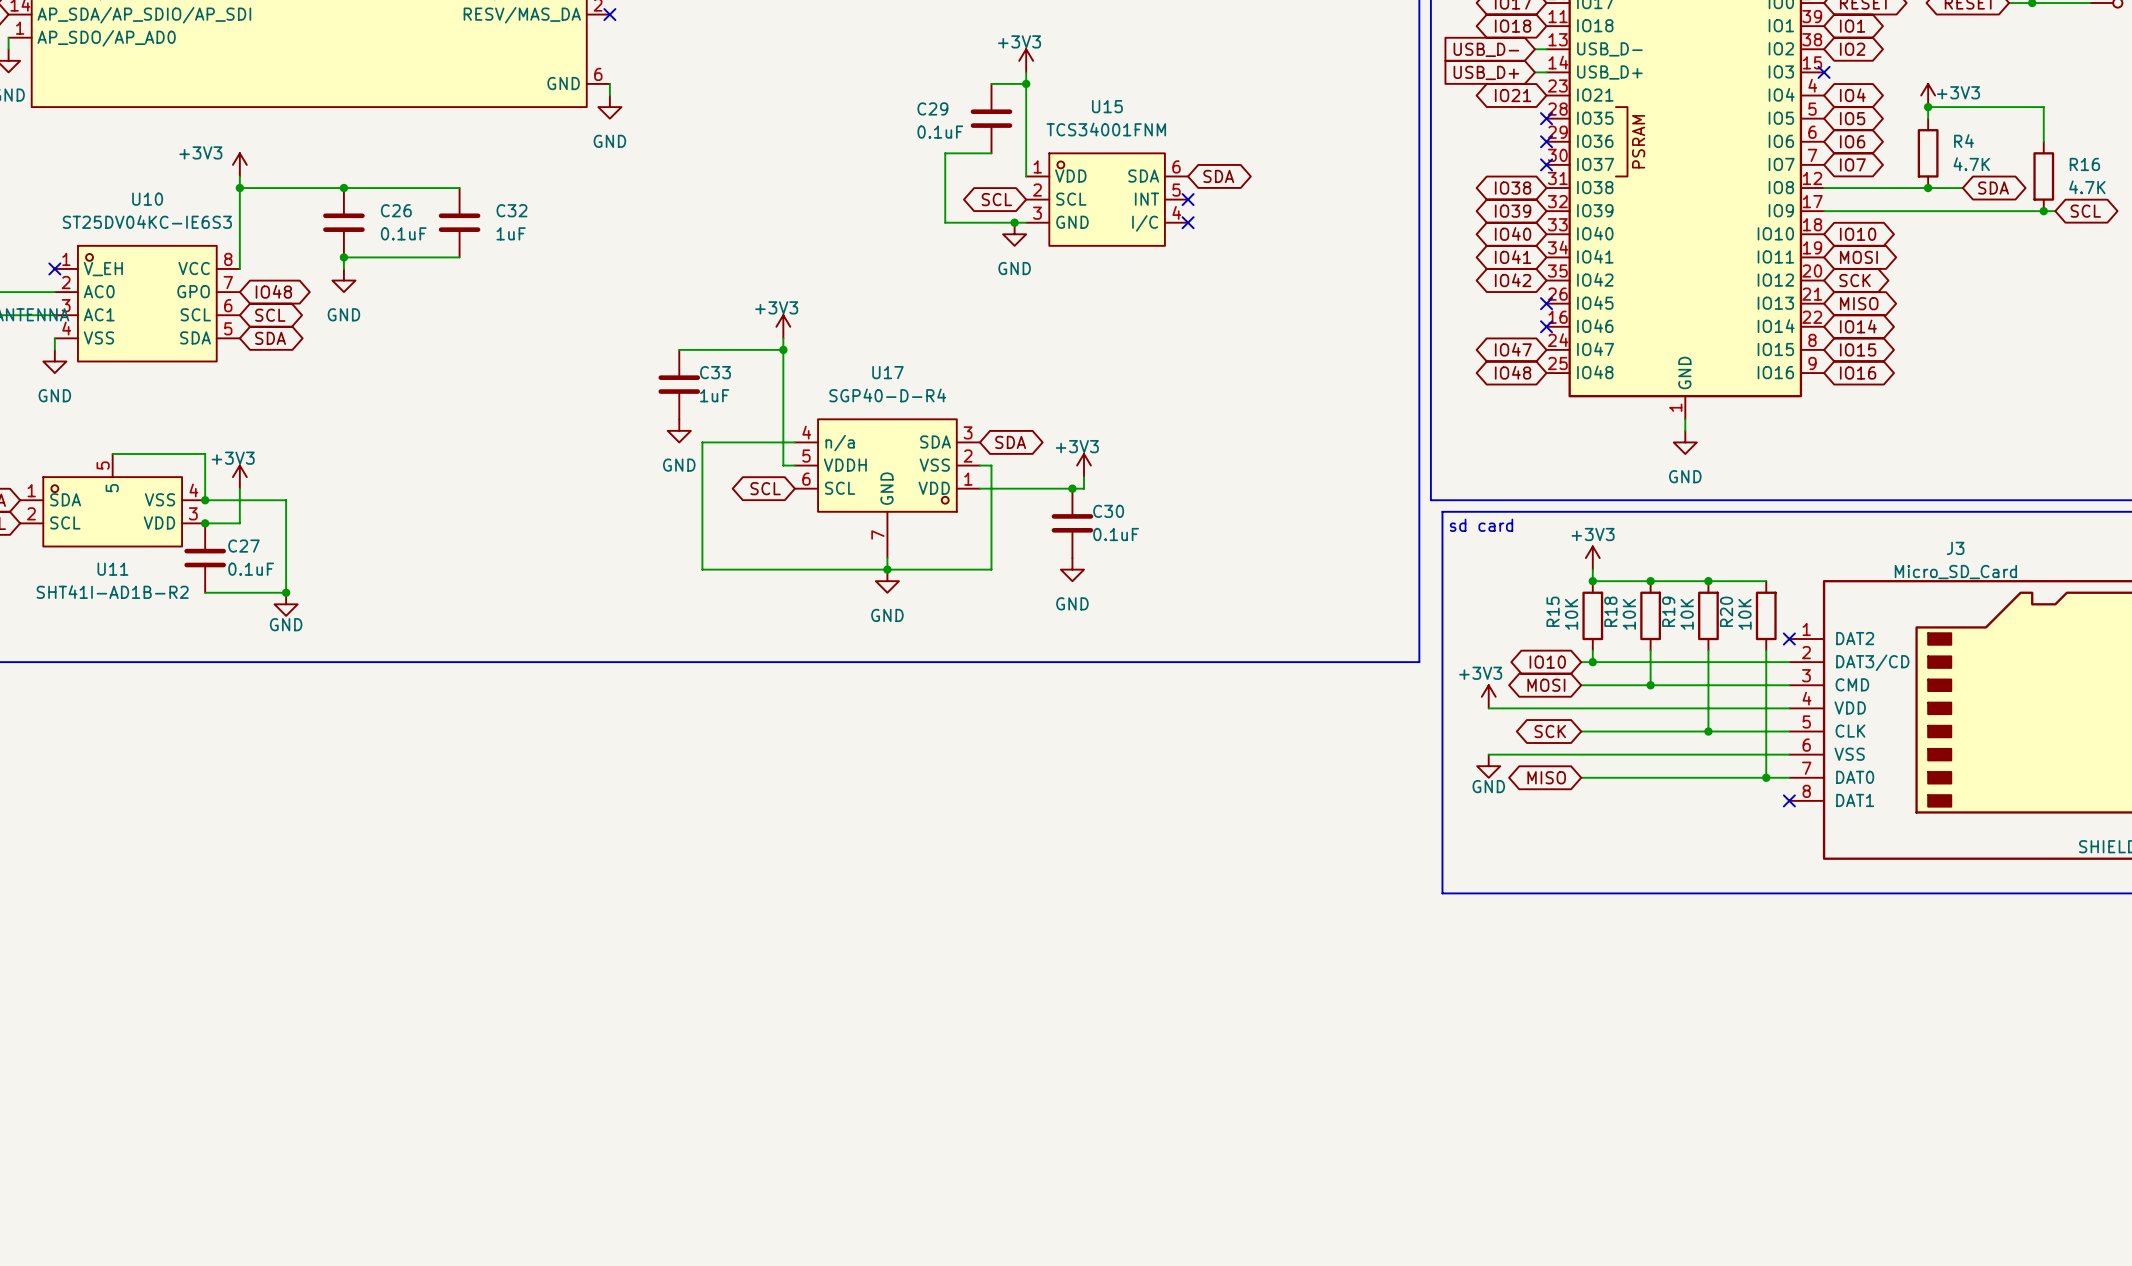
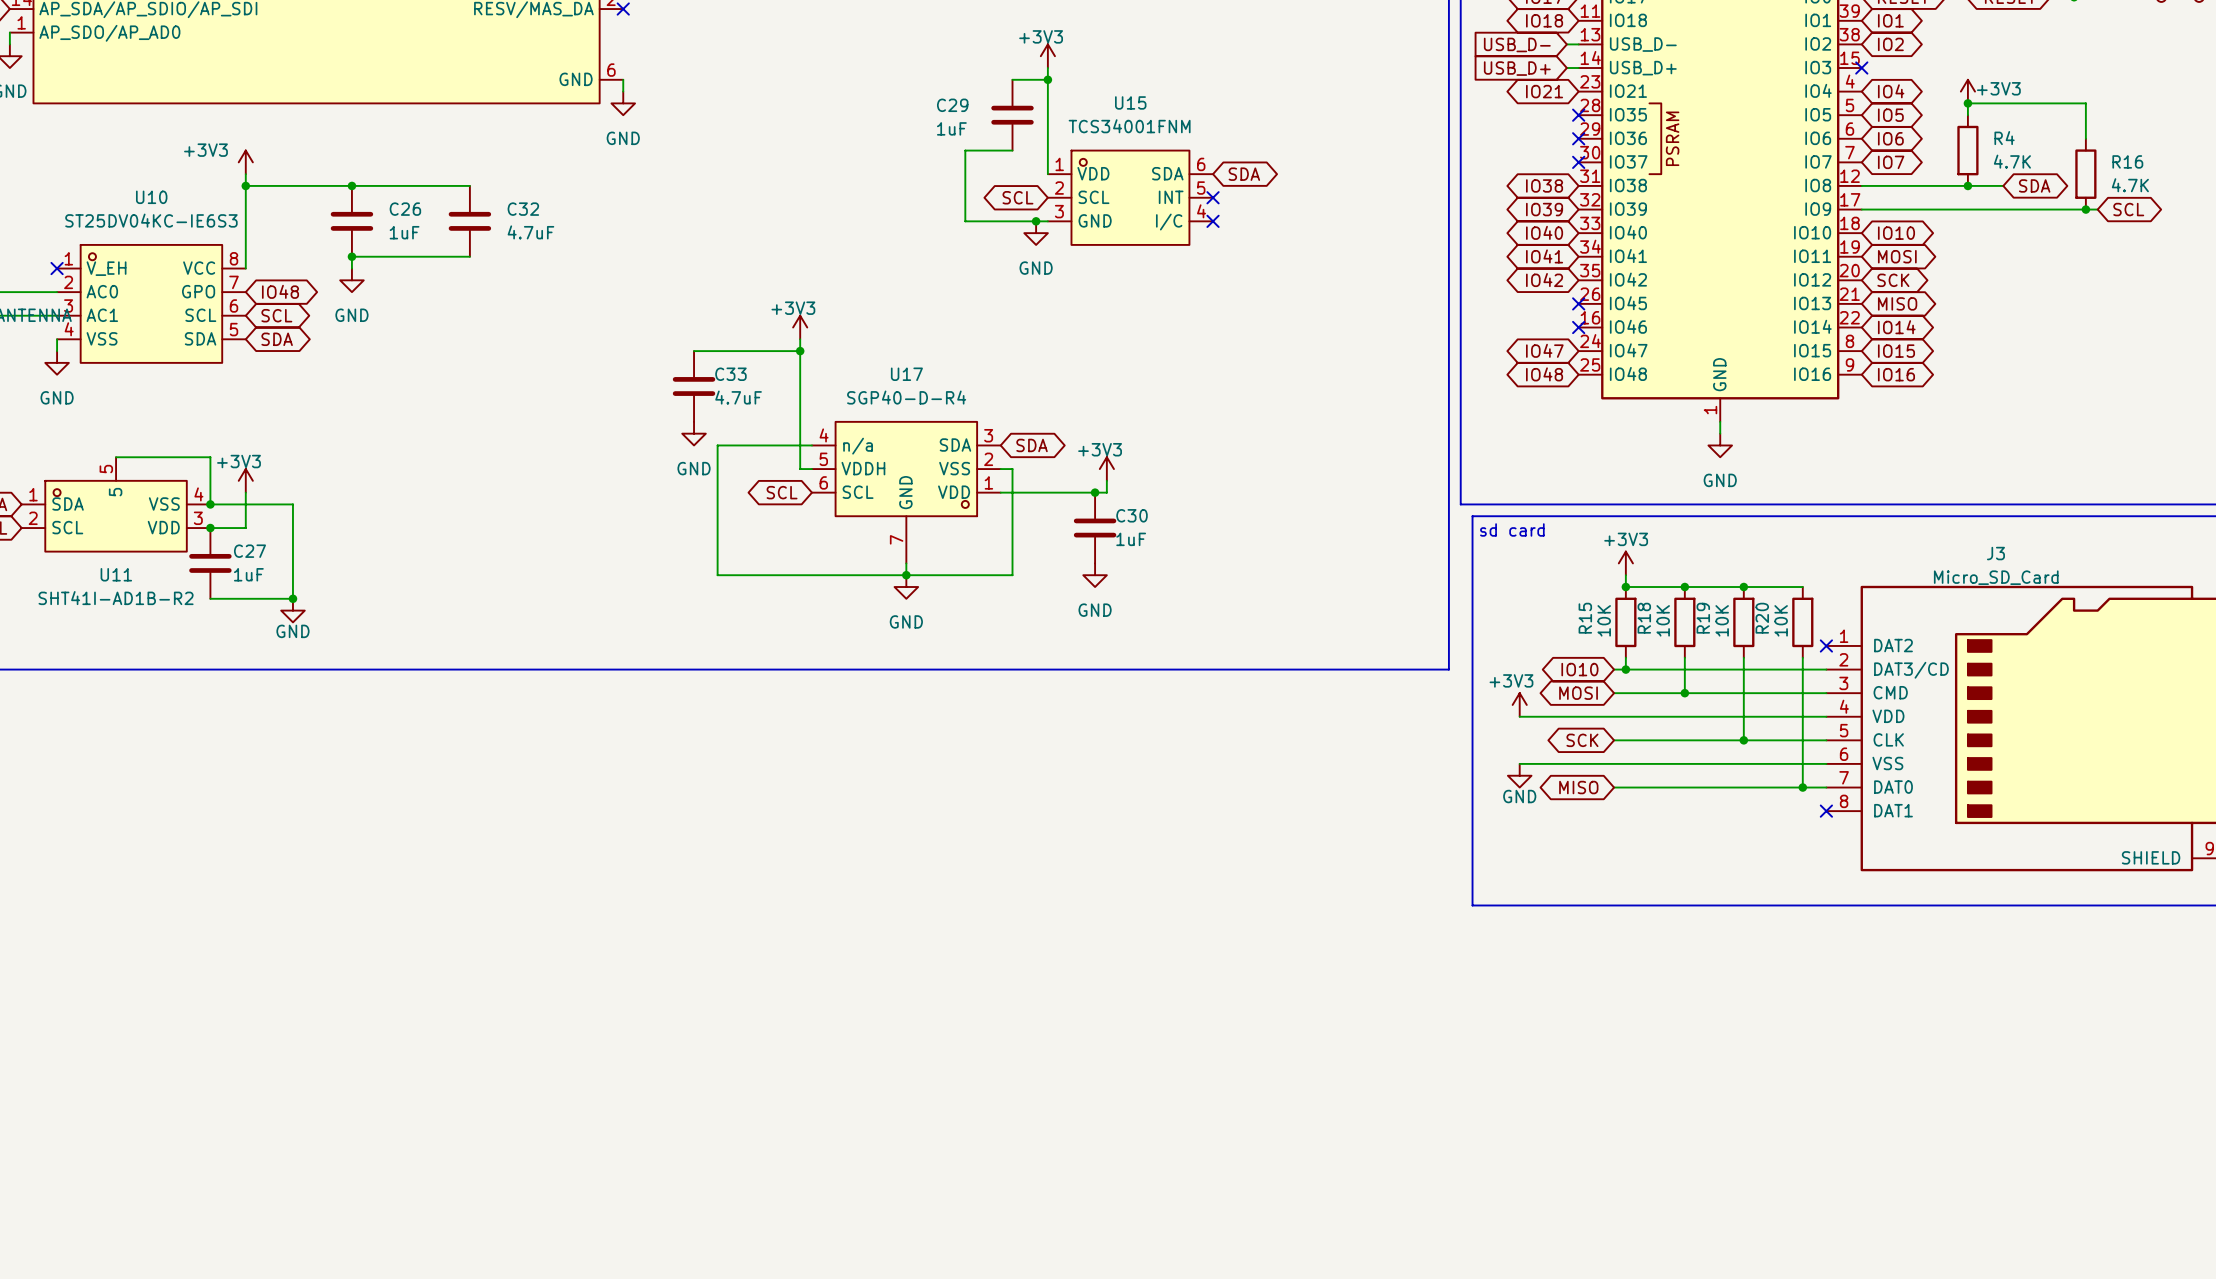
C29 value: 0.1uF (940, 132) -> 1uF (951, 128)
C26 value: 0.1uF (403, 233) -> 1uF (404, 232)
C32 value: 1uF (511, 233) -> 4.7uF (530, 232)
C33 value: 1uF (714, 395) -> 4.7uF (738, 397)
C30 value: 0.1uF (1116, 534) -> 1uF (1131, 539)
C27 value: 0.1uF (251, 569) -> 1uF (248, 574)

